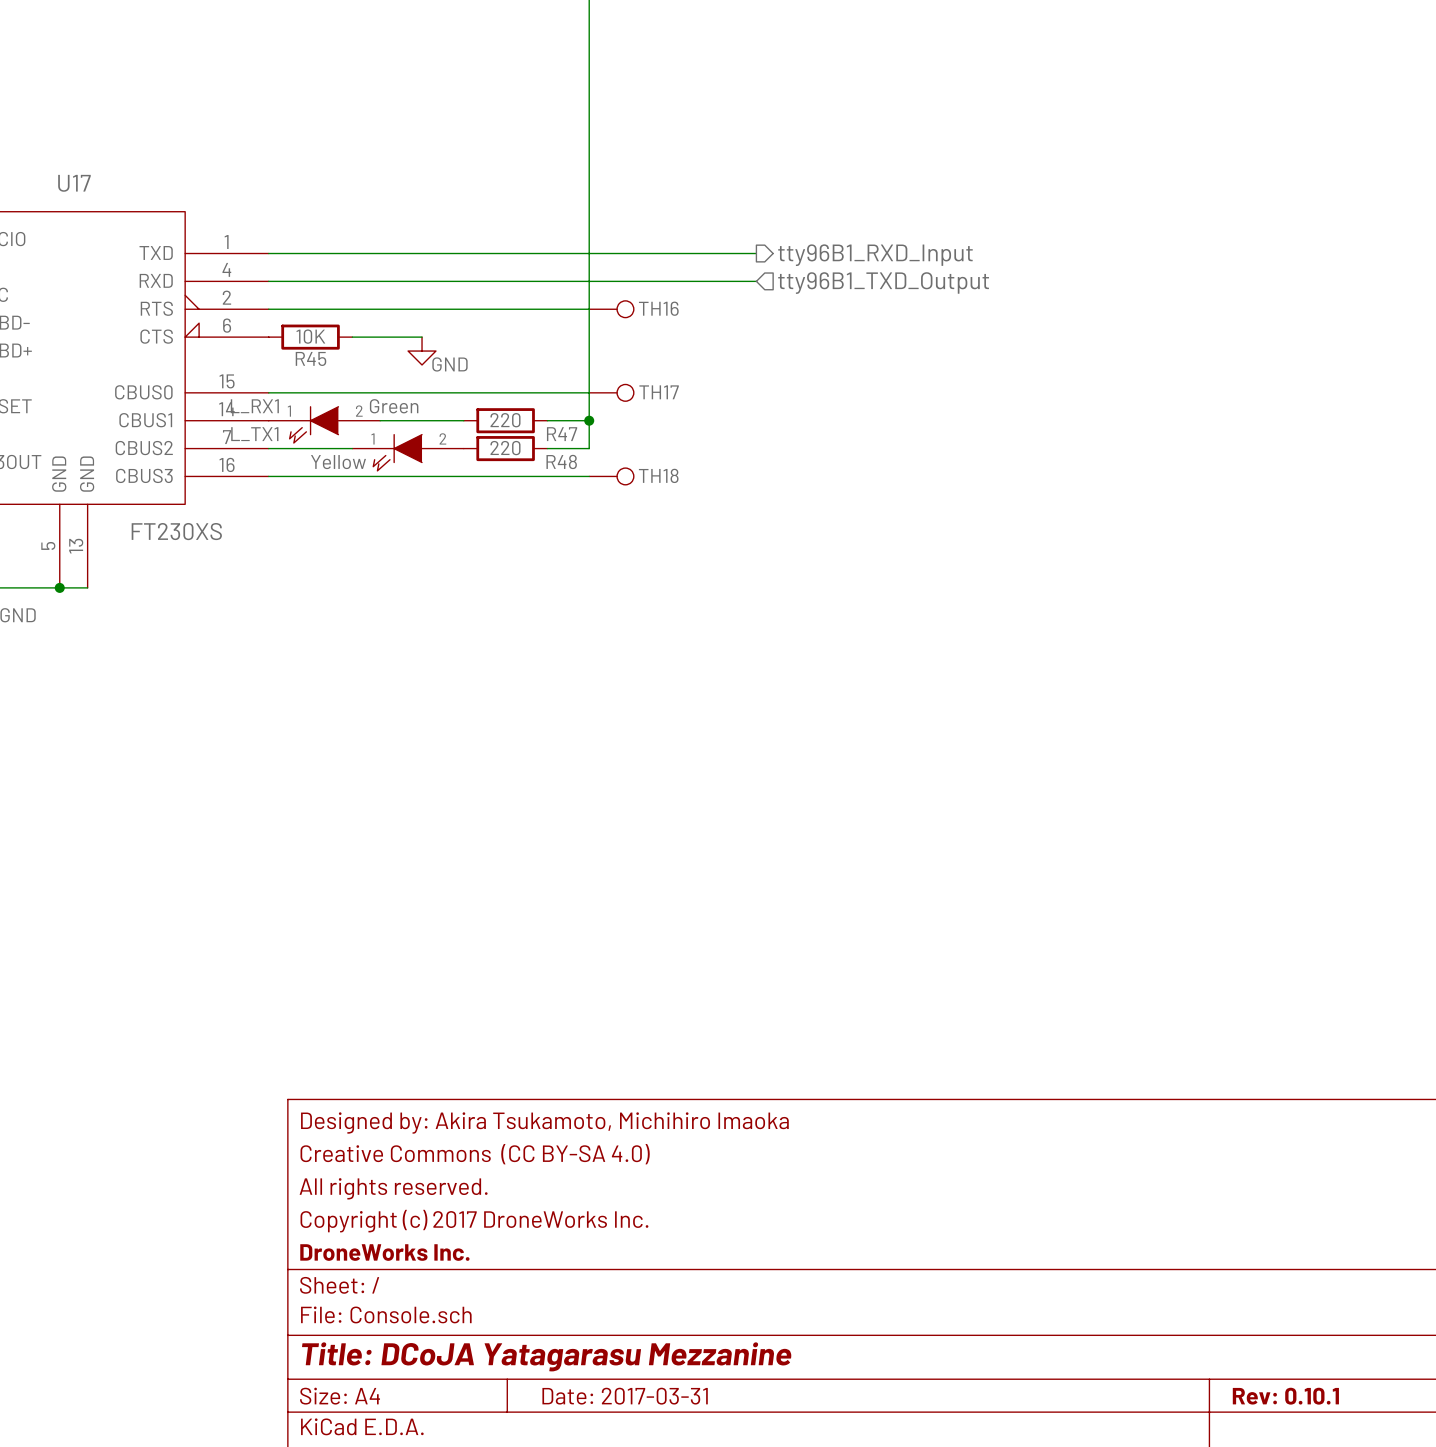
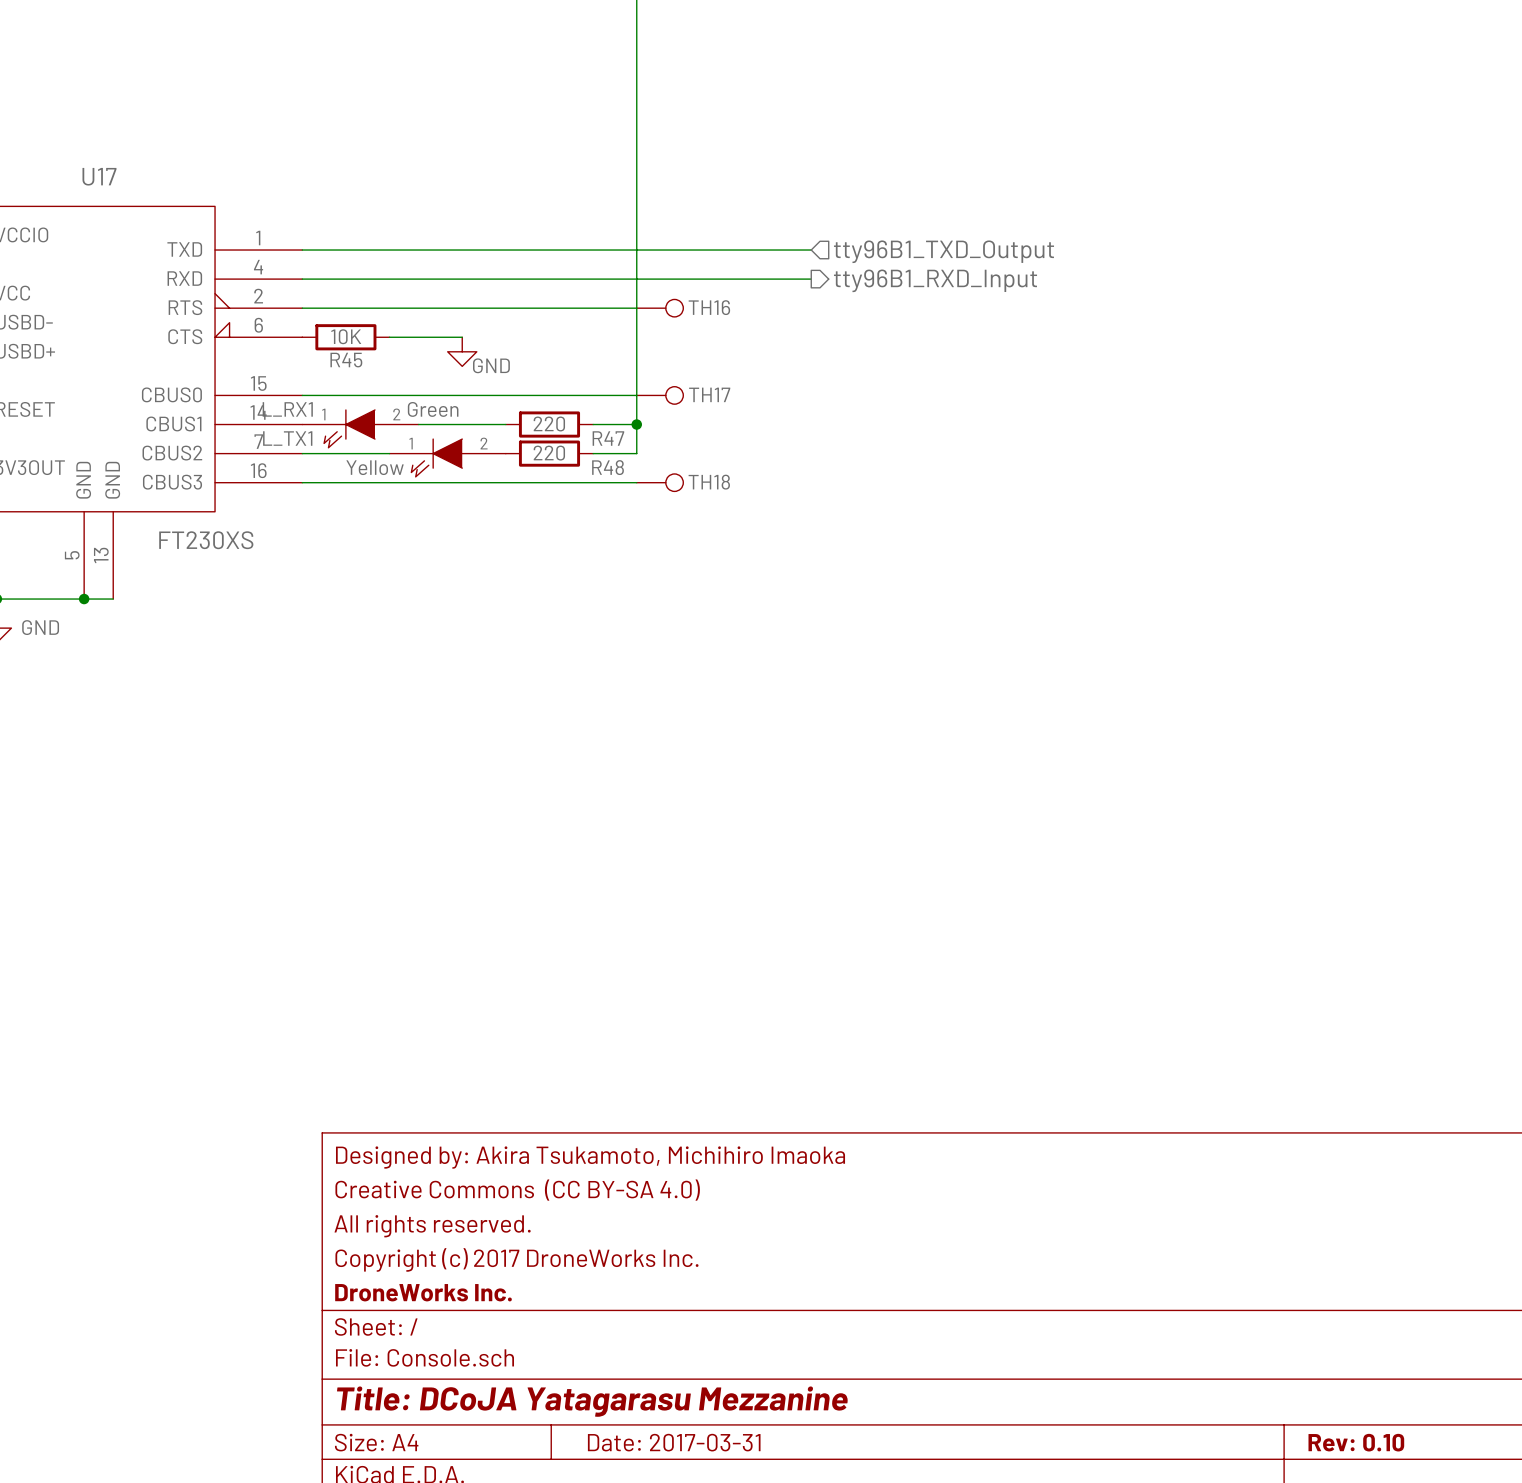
hierarchical label shape: output (875, 255) -> input (944, 251)
hierarchical label: tty96B1_RXD_Input (875, 255) -> tty96B1_TXD_Output (944, 251)
hierarchical label shape: input (883, 283) -> output (935, 280)
hierarchical label: tty96B1_TXD_Output (883, 283) -> tty96B1_RXD_Input (935, 280)
title block: Rev: 0.10.1 (1285, 1396) -> Rev: 0.10 (1356, 1442)

